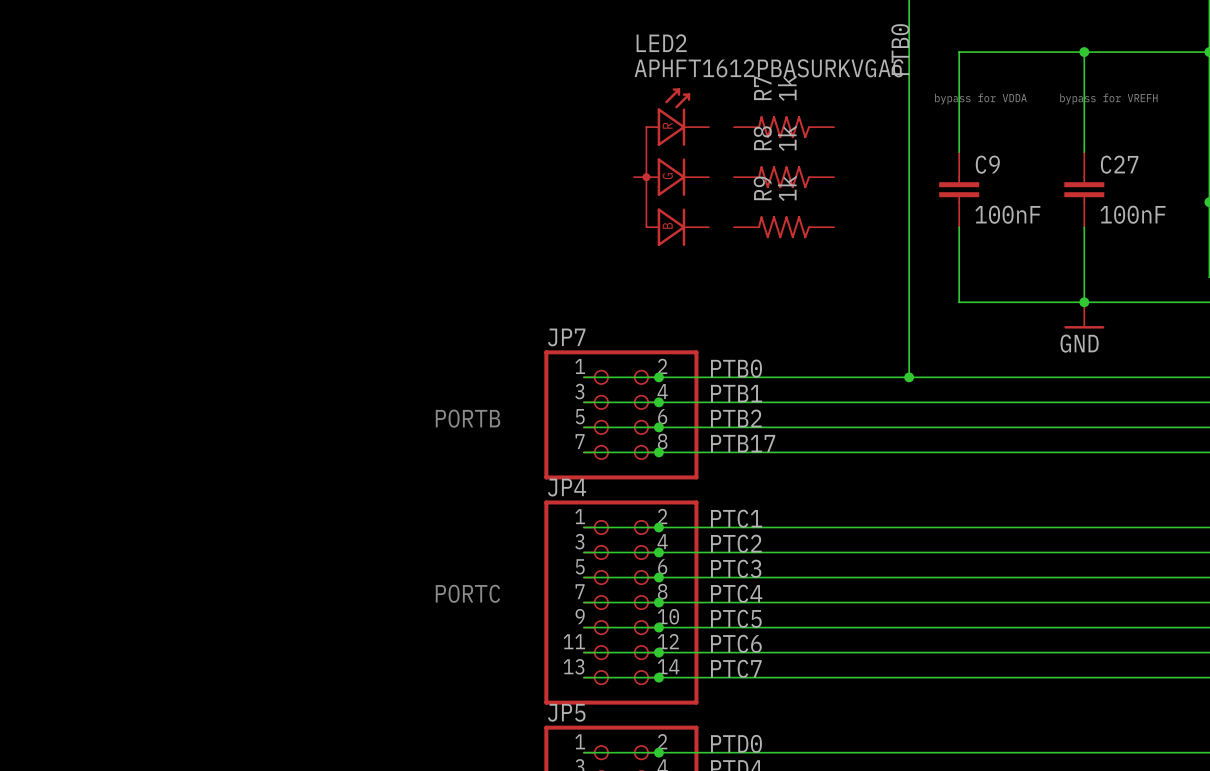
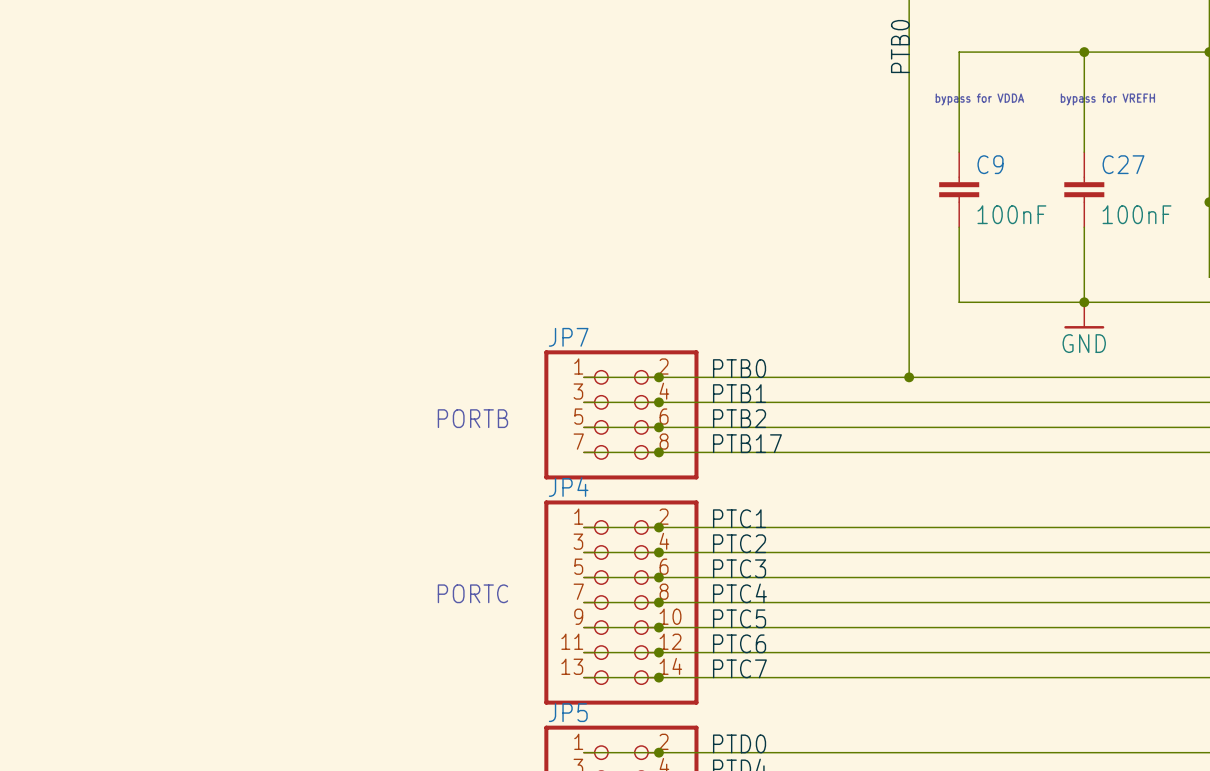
R7: 1k (784, 127) -> none
LED2: APHFT1612PBASURKVGAC (671, 167) -> none
R8: 1k (784, 177) -> none
R9: 1k (784, 227) -> none

